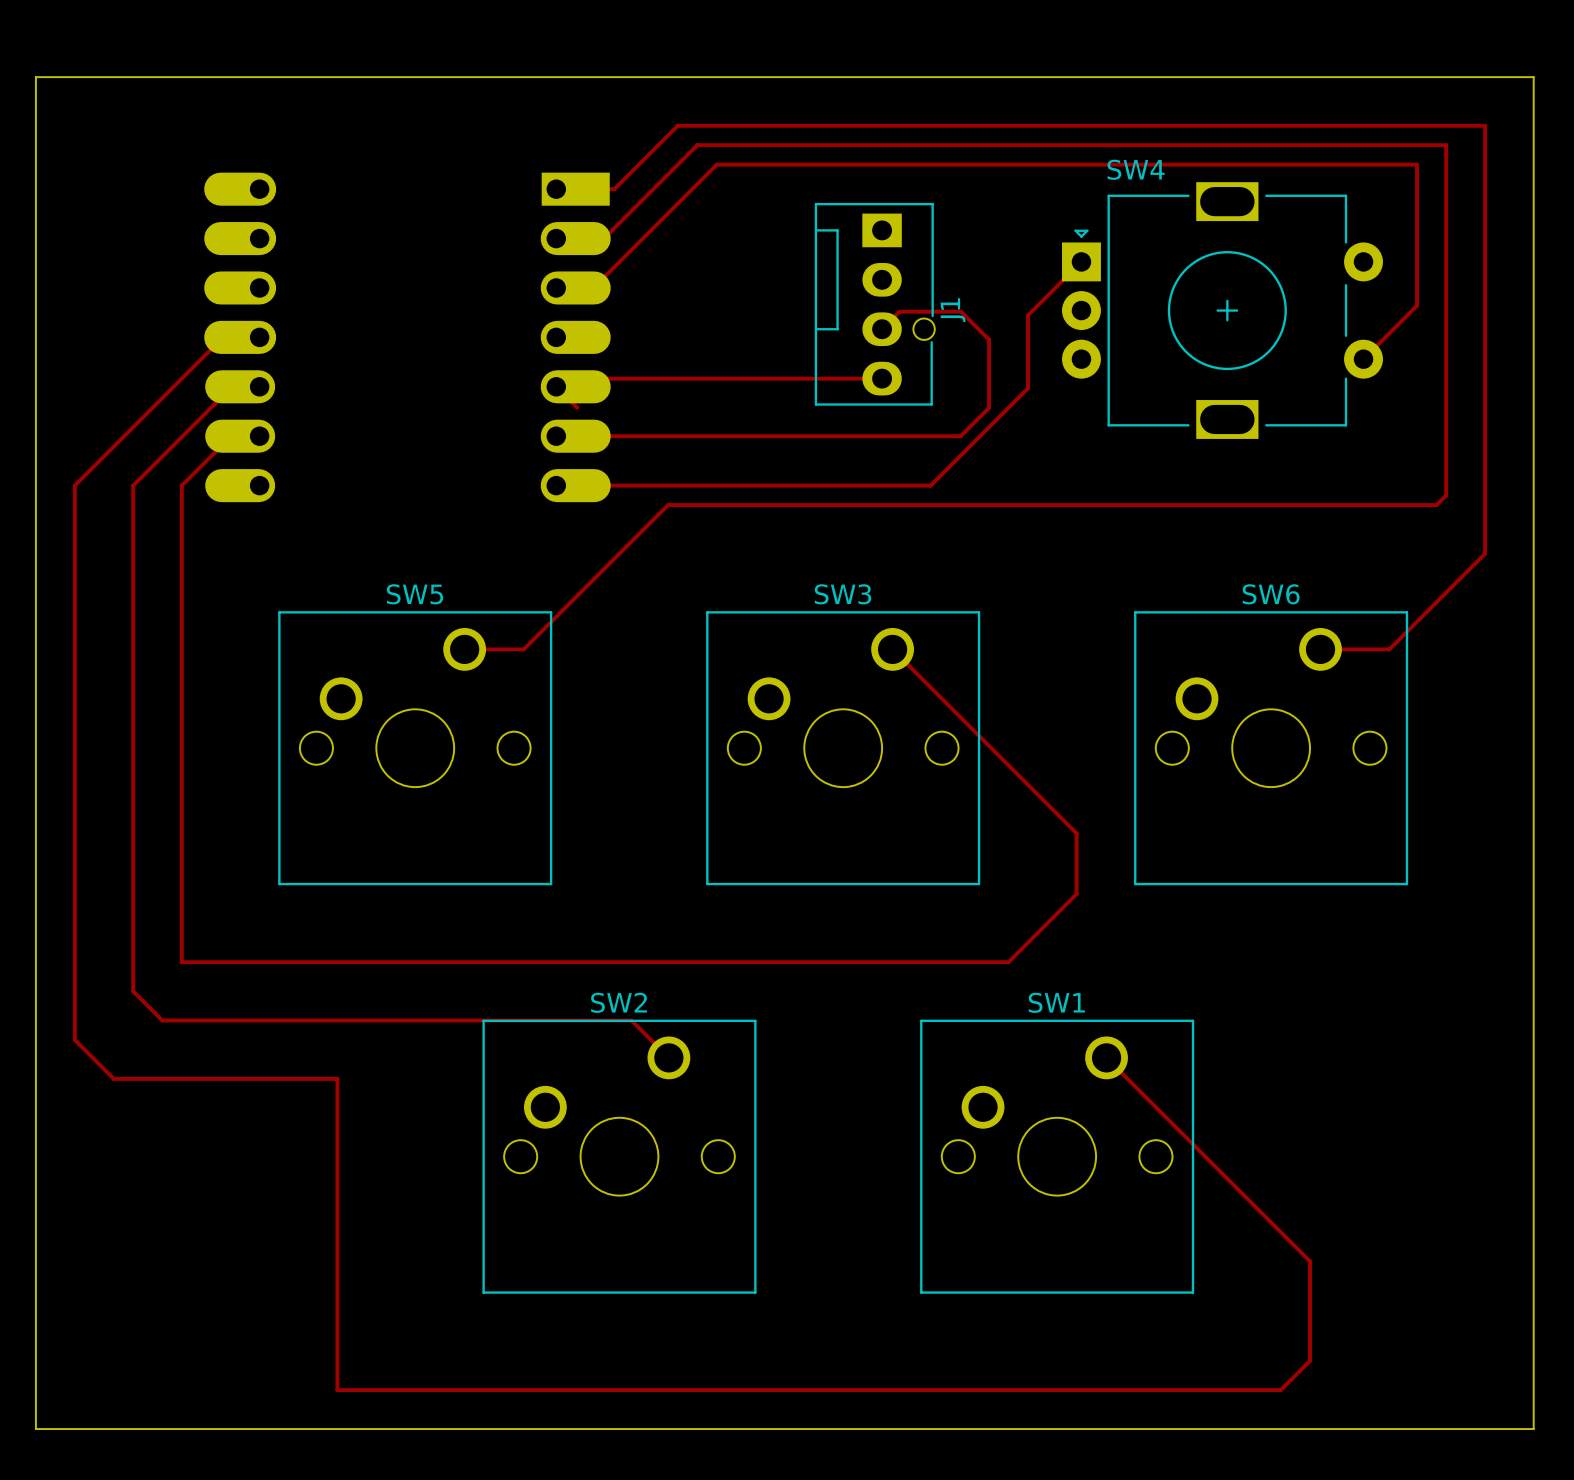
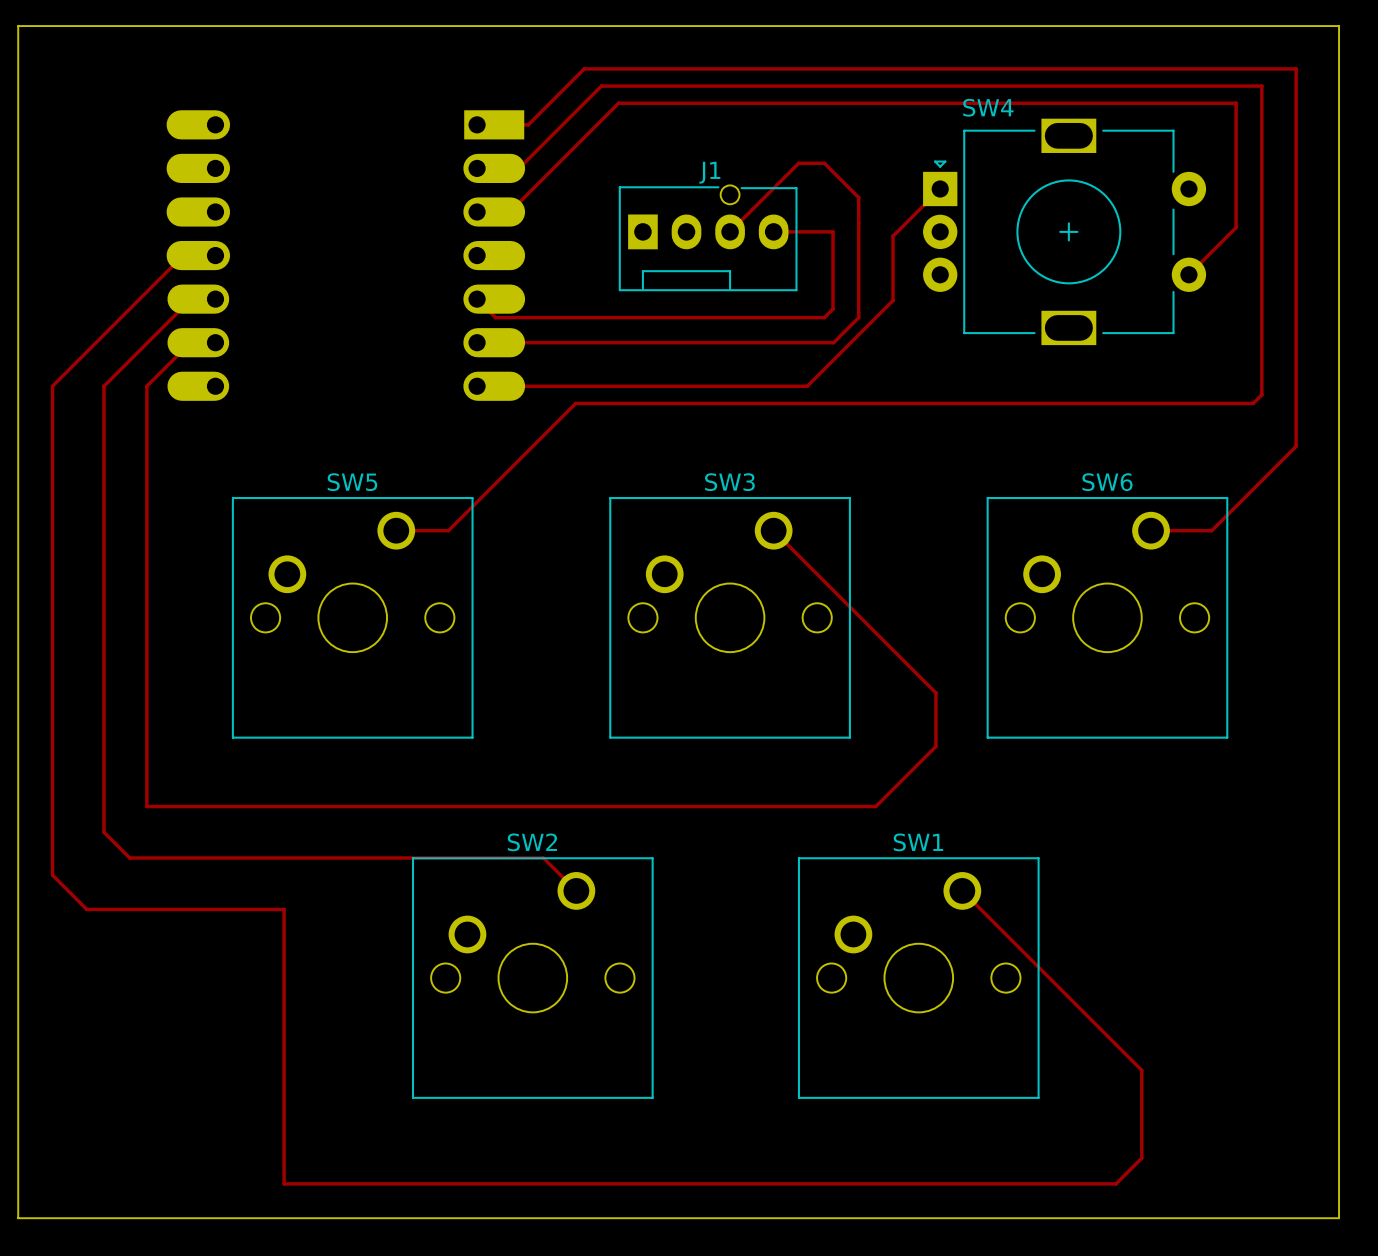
J1 rotation: 0° (874, 304) -> 90° counterclockwise (708, 238)
track: none -> (773, 231) (833, 231) (833, 309) (824, 317) (495, 317)
track: (882, 329) (899, 311) (961, 311) (989, 339) -> (730, 231) (798, 163) (824, 163) (858, 197) (858, 257)
track: (882, 378) (564, 378) (556, 386) -> none

